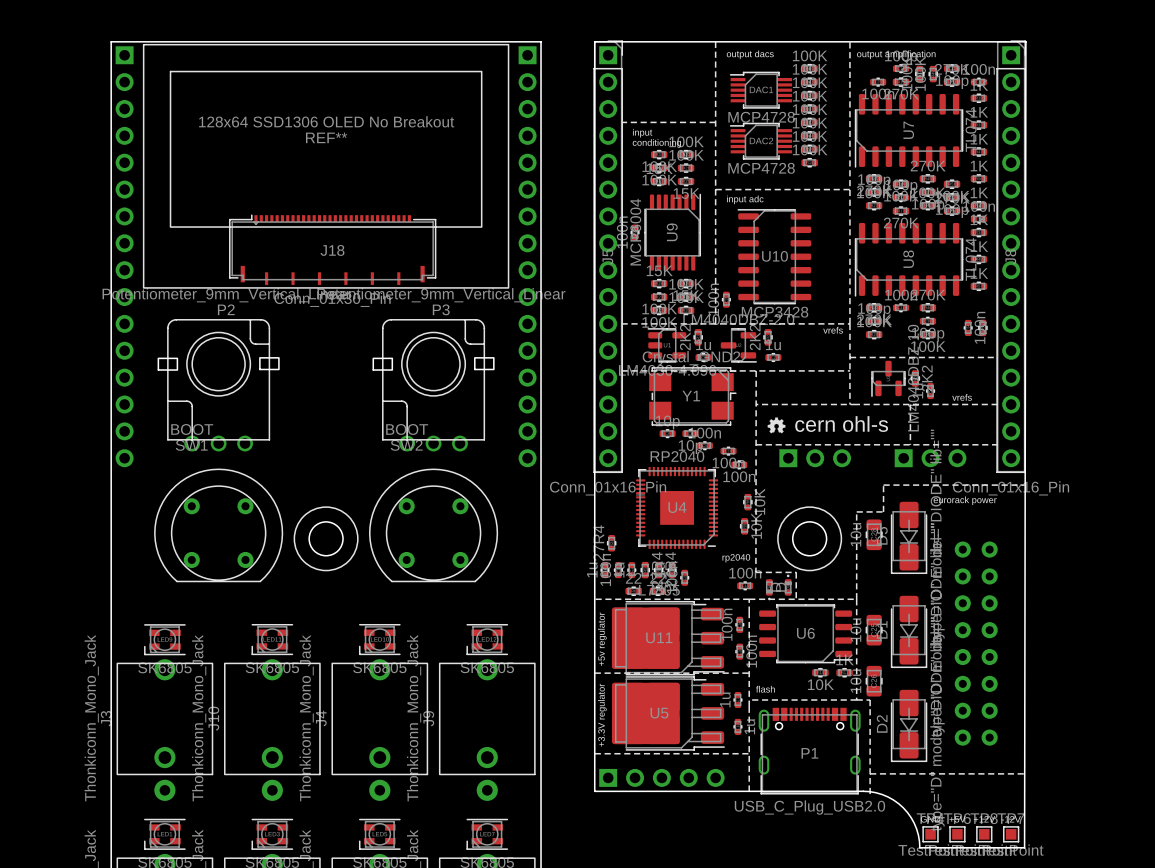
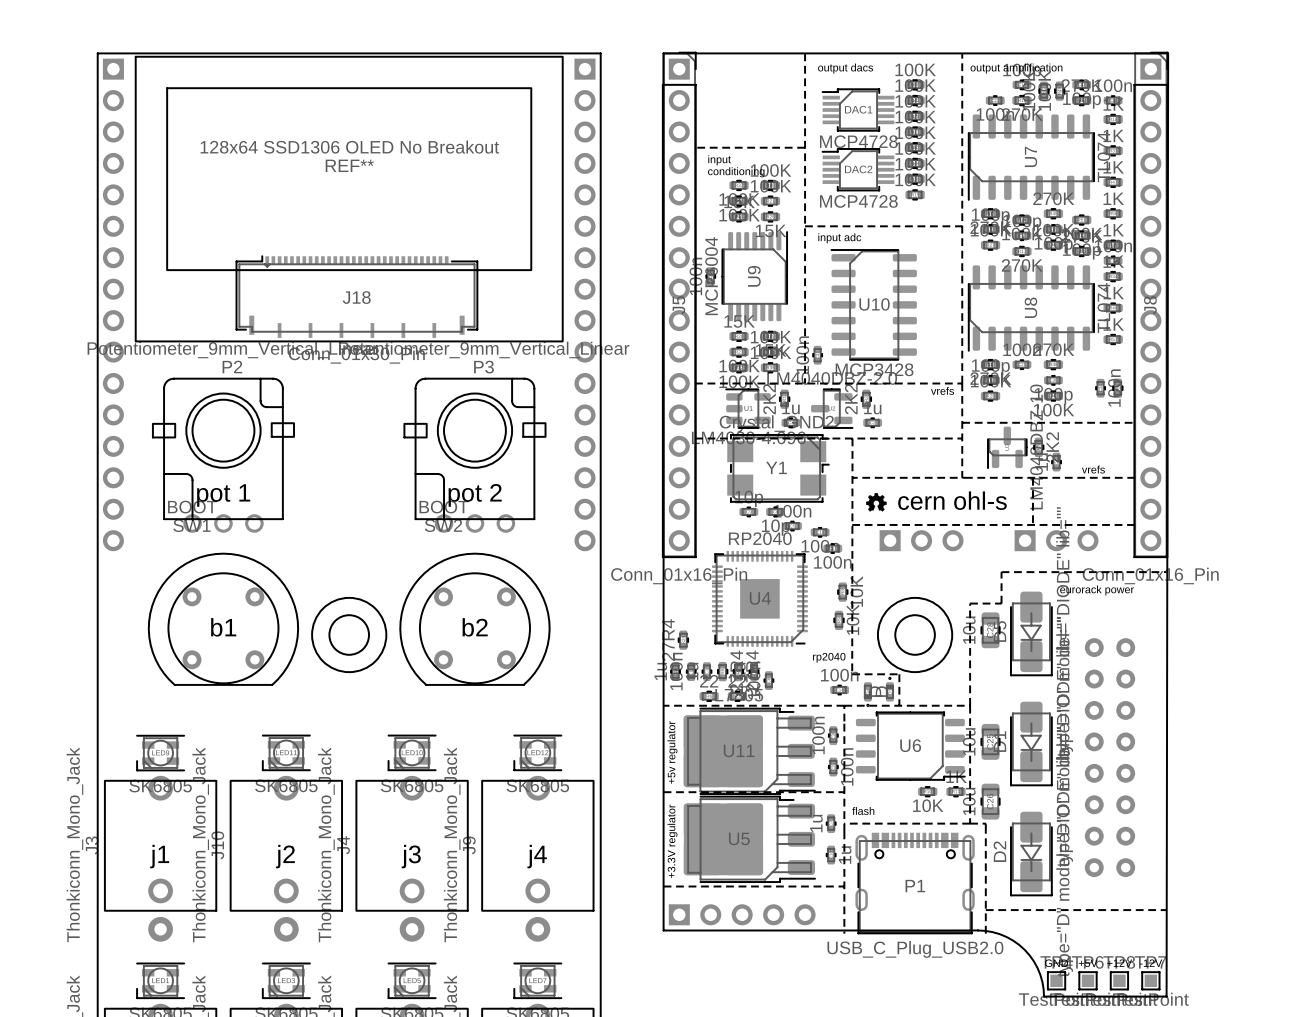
text: none -> pot 1 (223, 495)
text: none -> pot 2 (475, 495)
text: none -> b1 (223, 627)
text: none -> b2 (475, 627)
text: none -> j1 (159, 856)
text: none -> j2 (285, 856)
text: none -> j3 (411, 856)
text: none -> j4 (537, 856)

